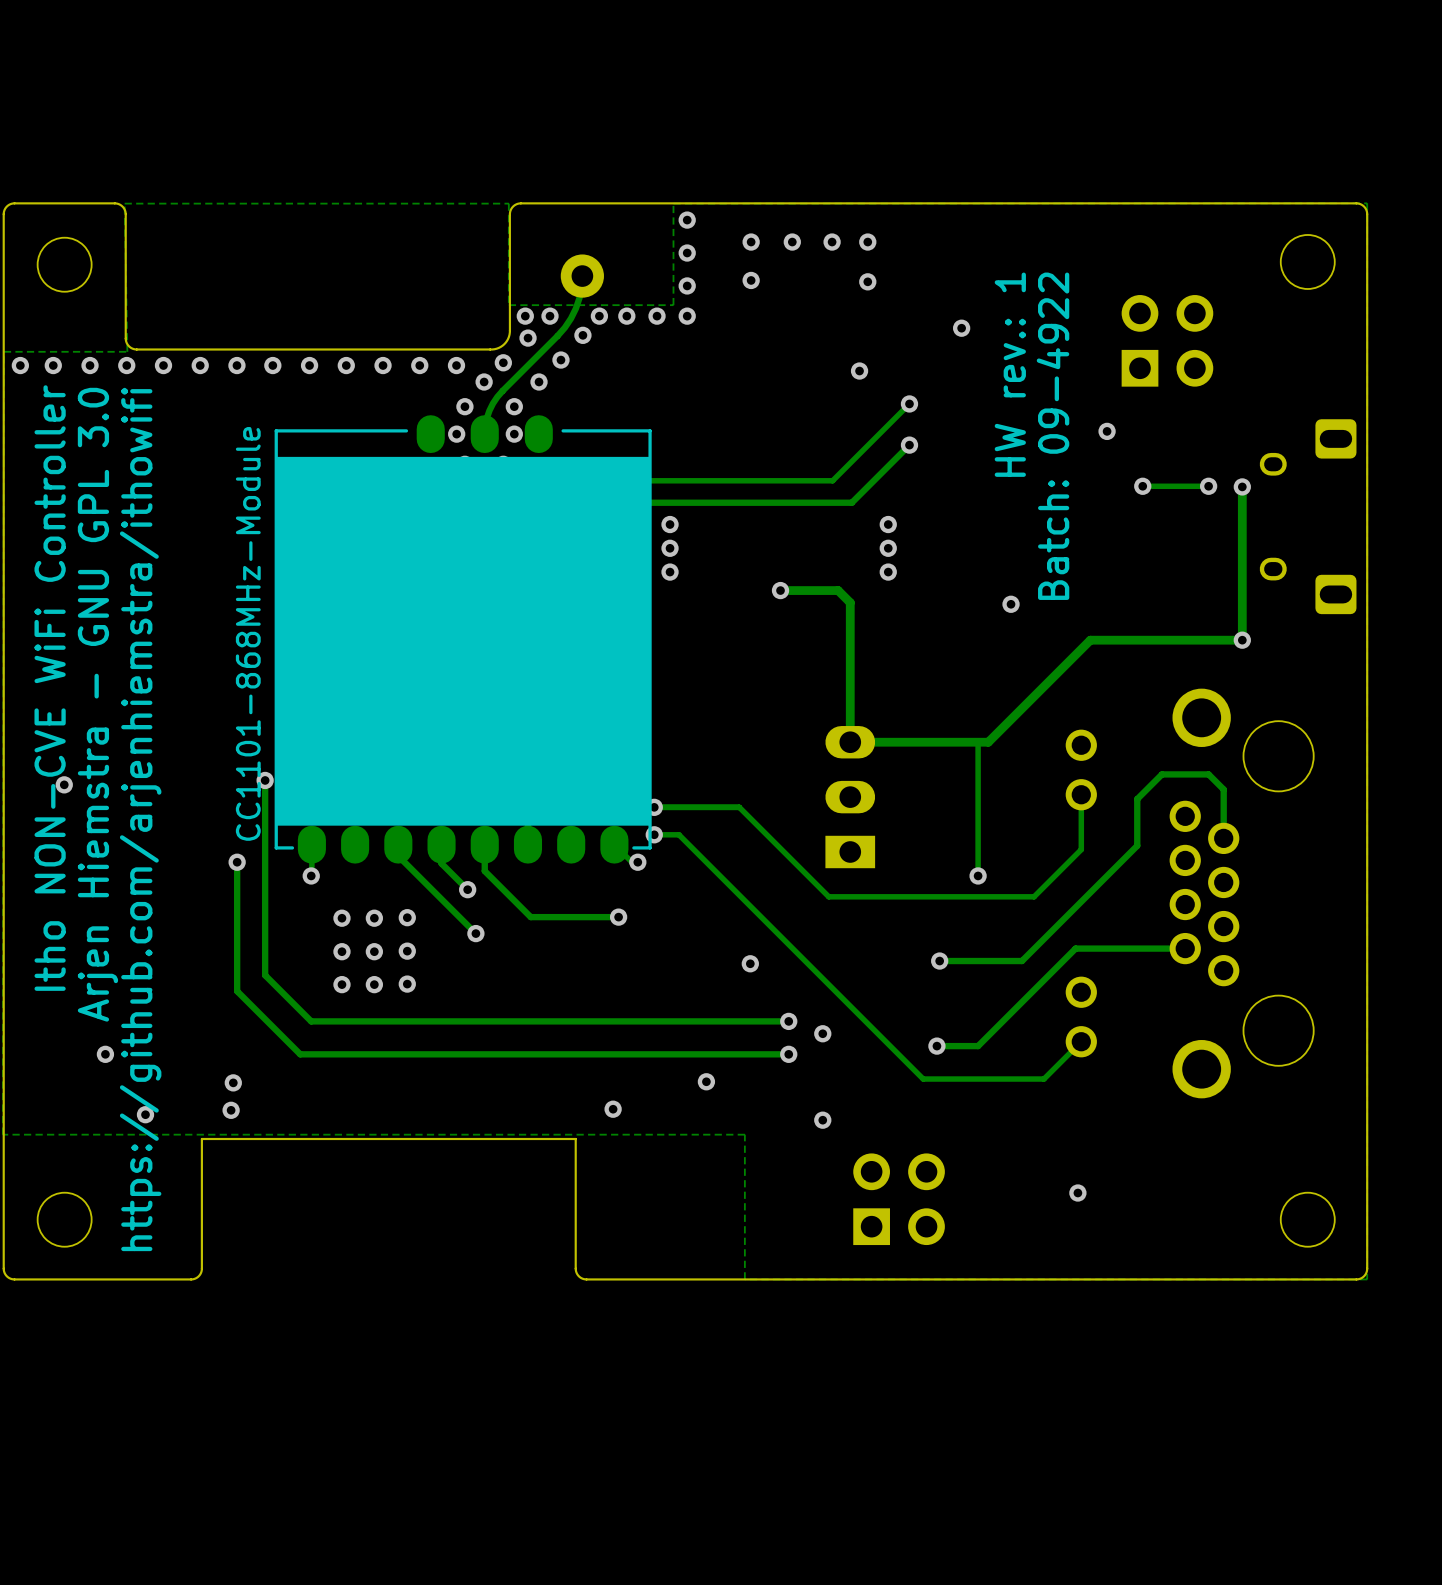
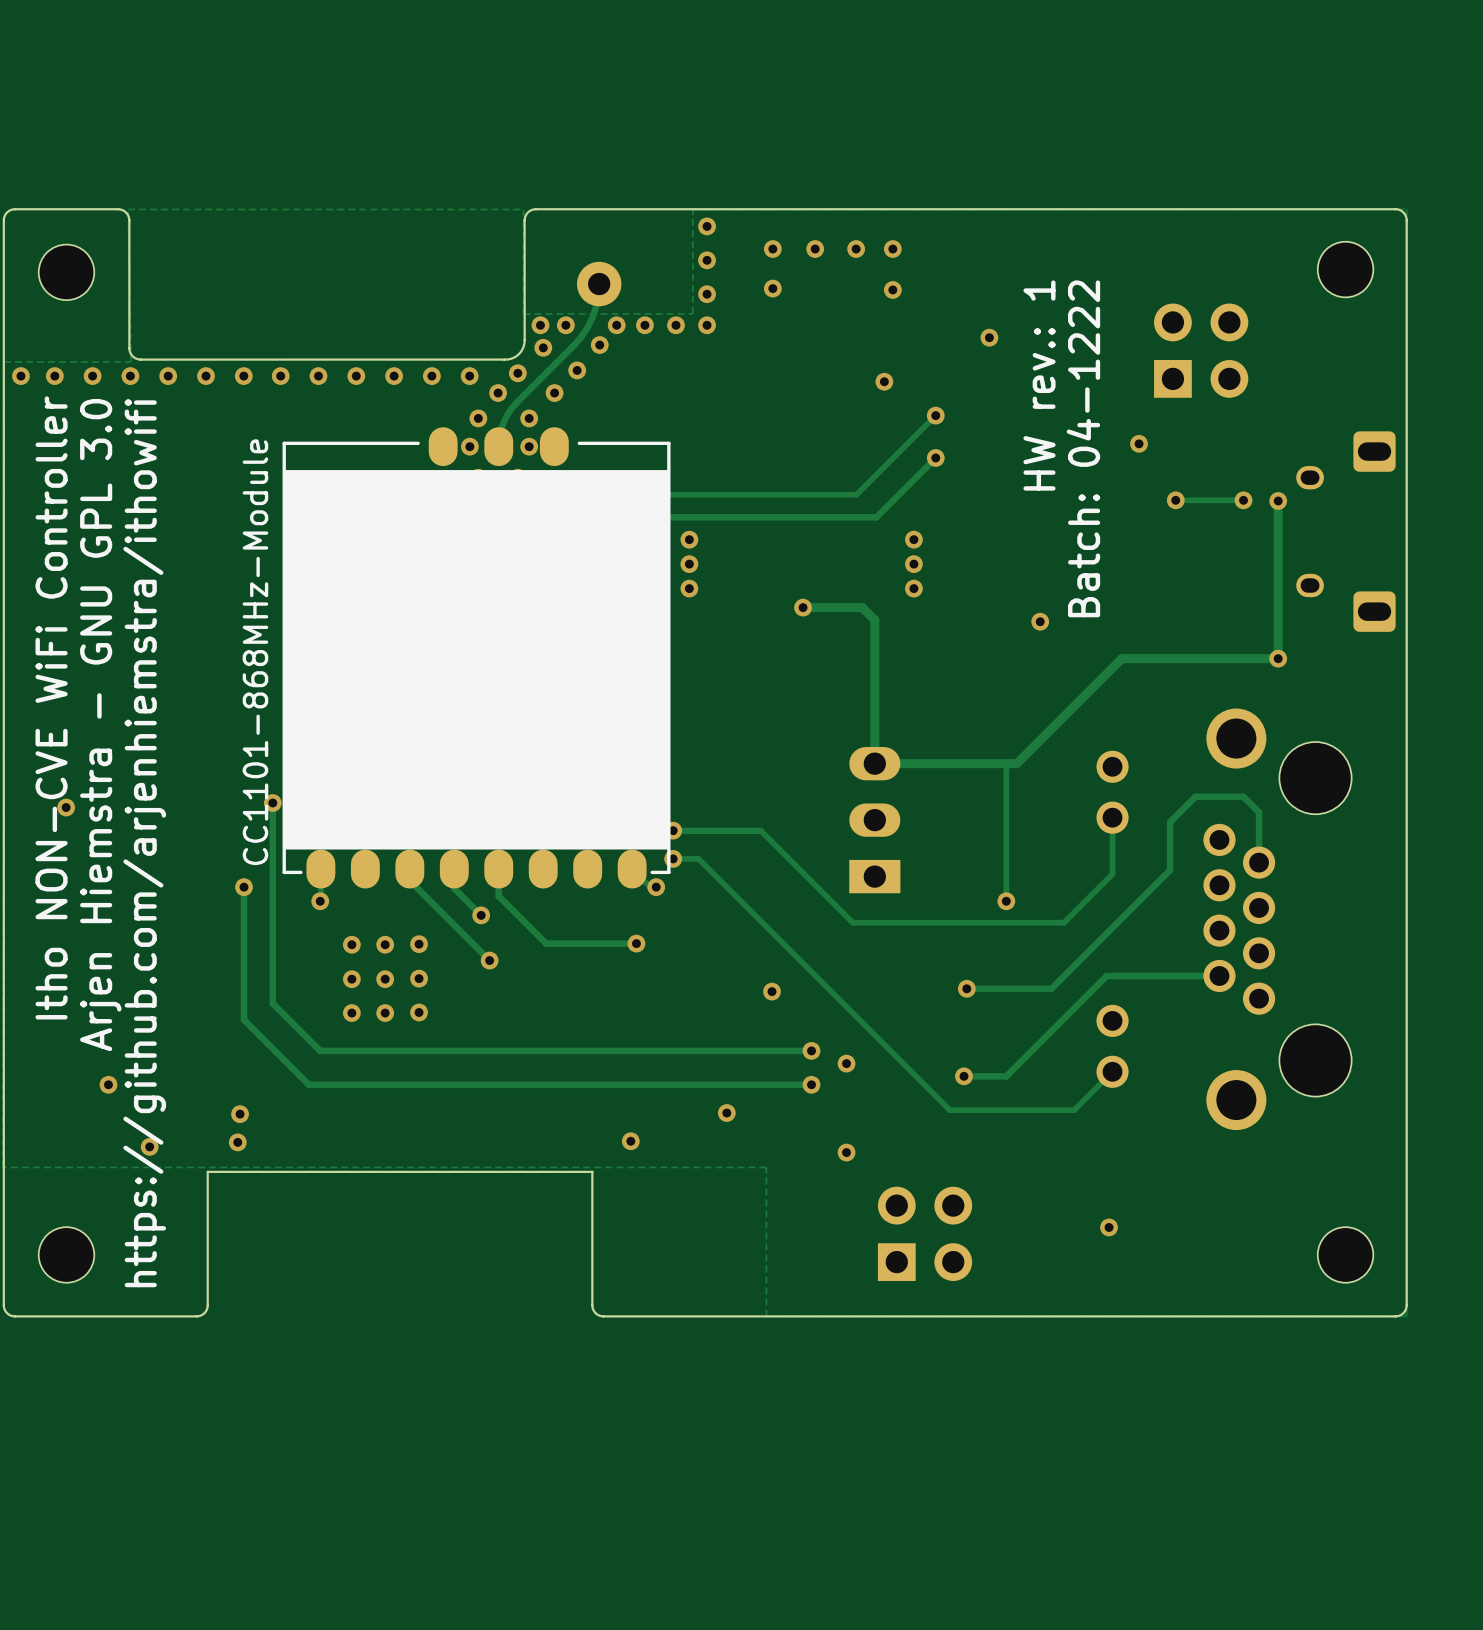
text: Batch: 09-4922 (1053, 436) -> Batch: 04-1222 (1083, 448)

